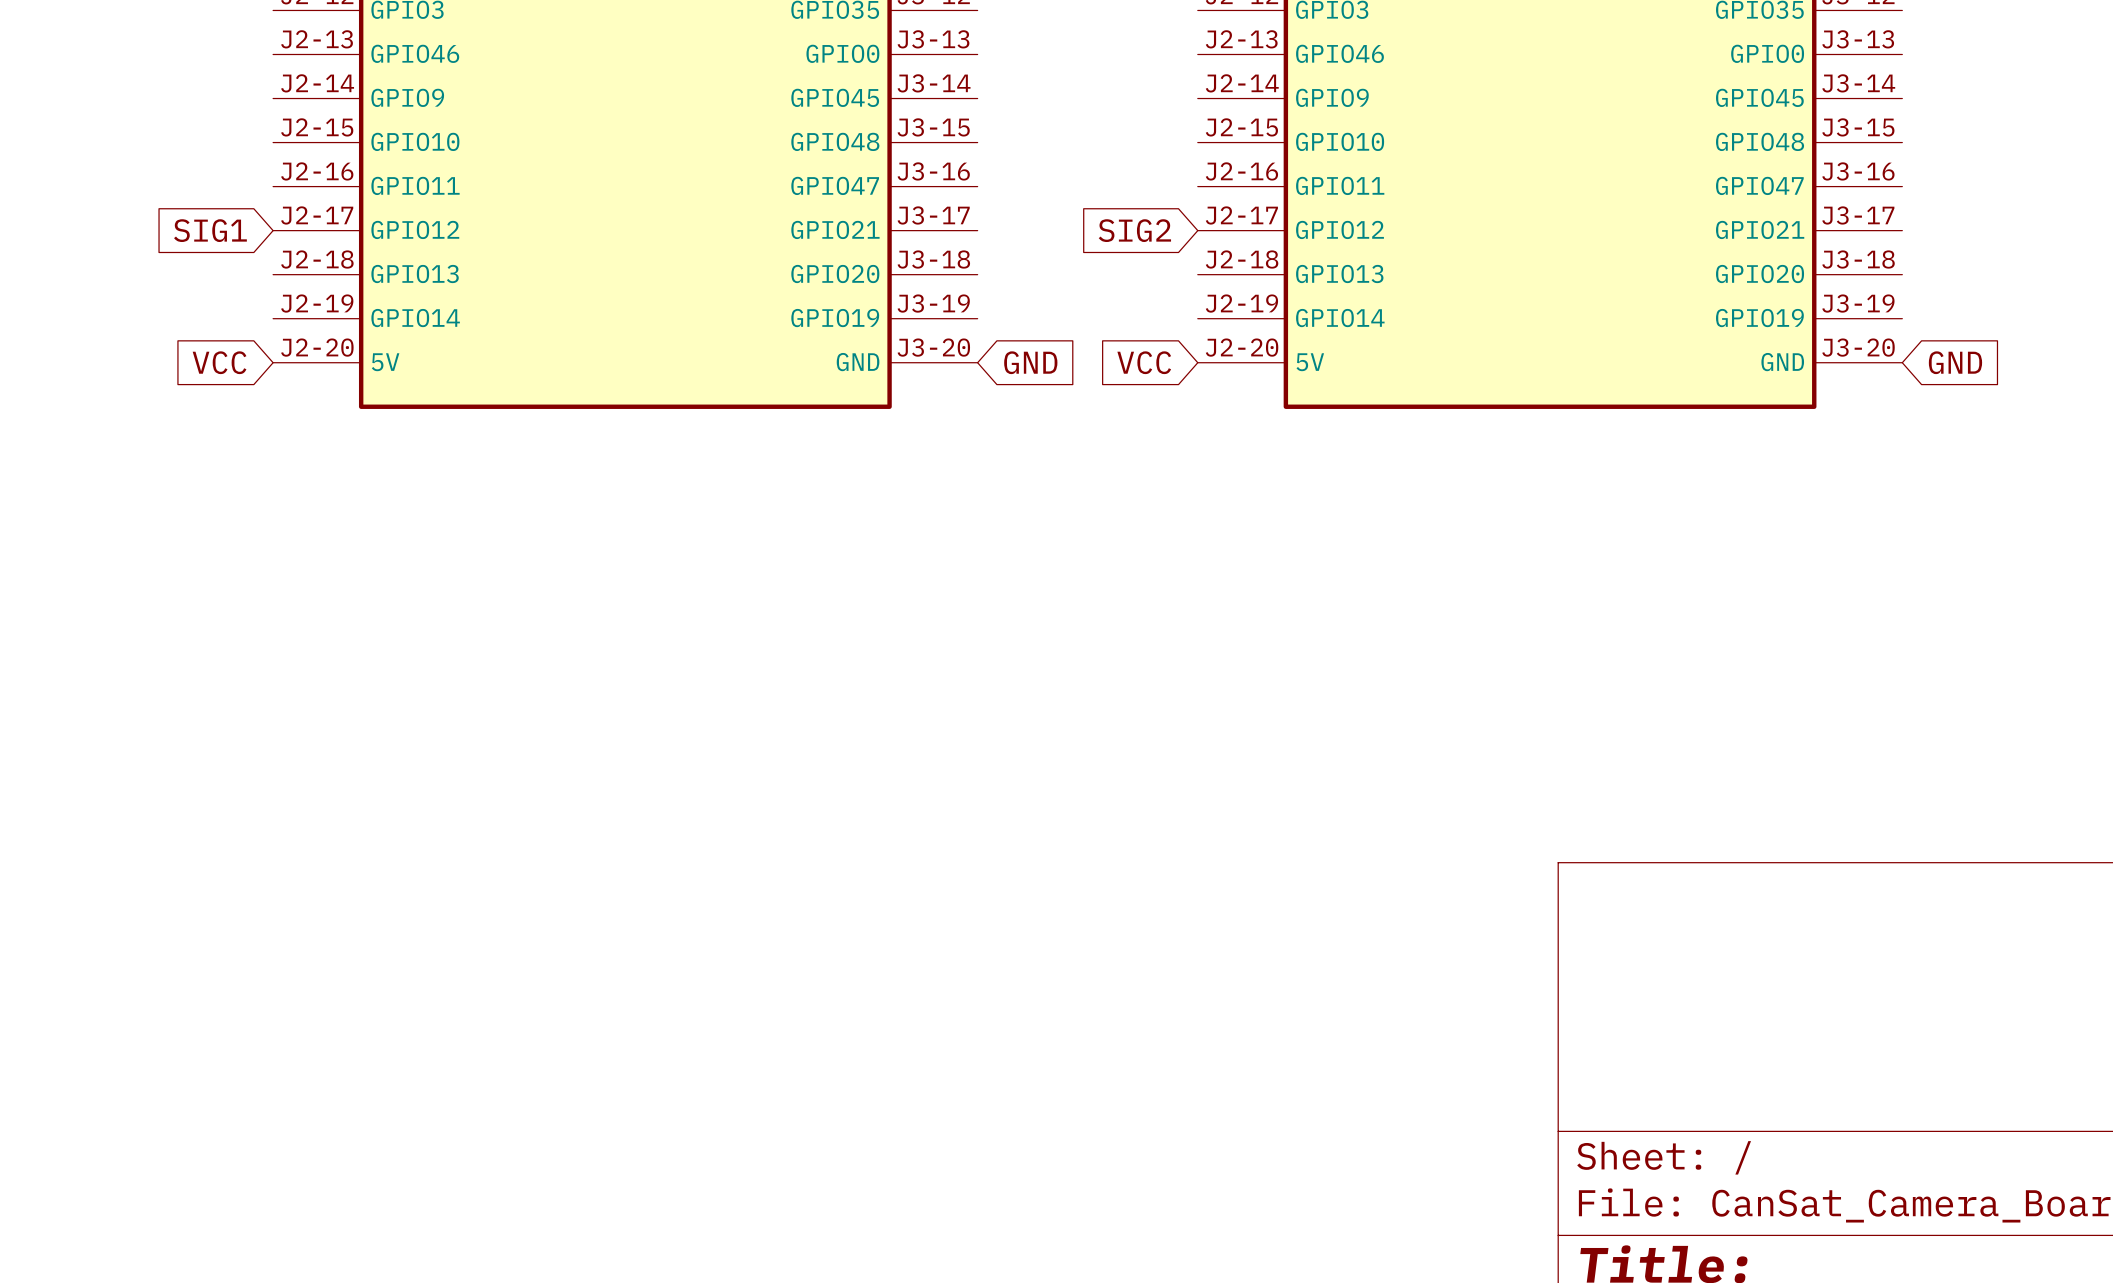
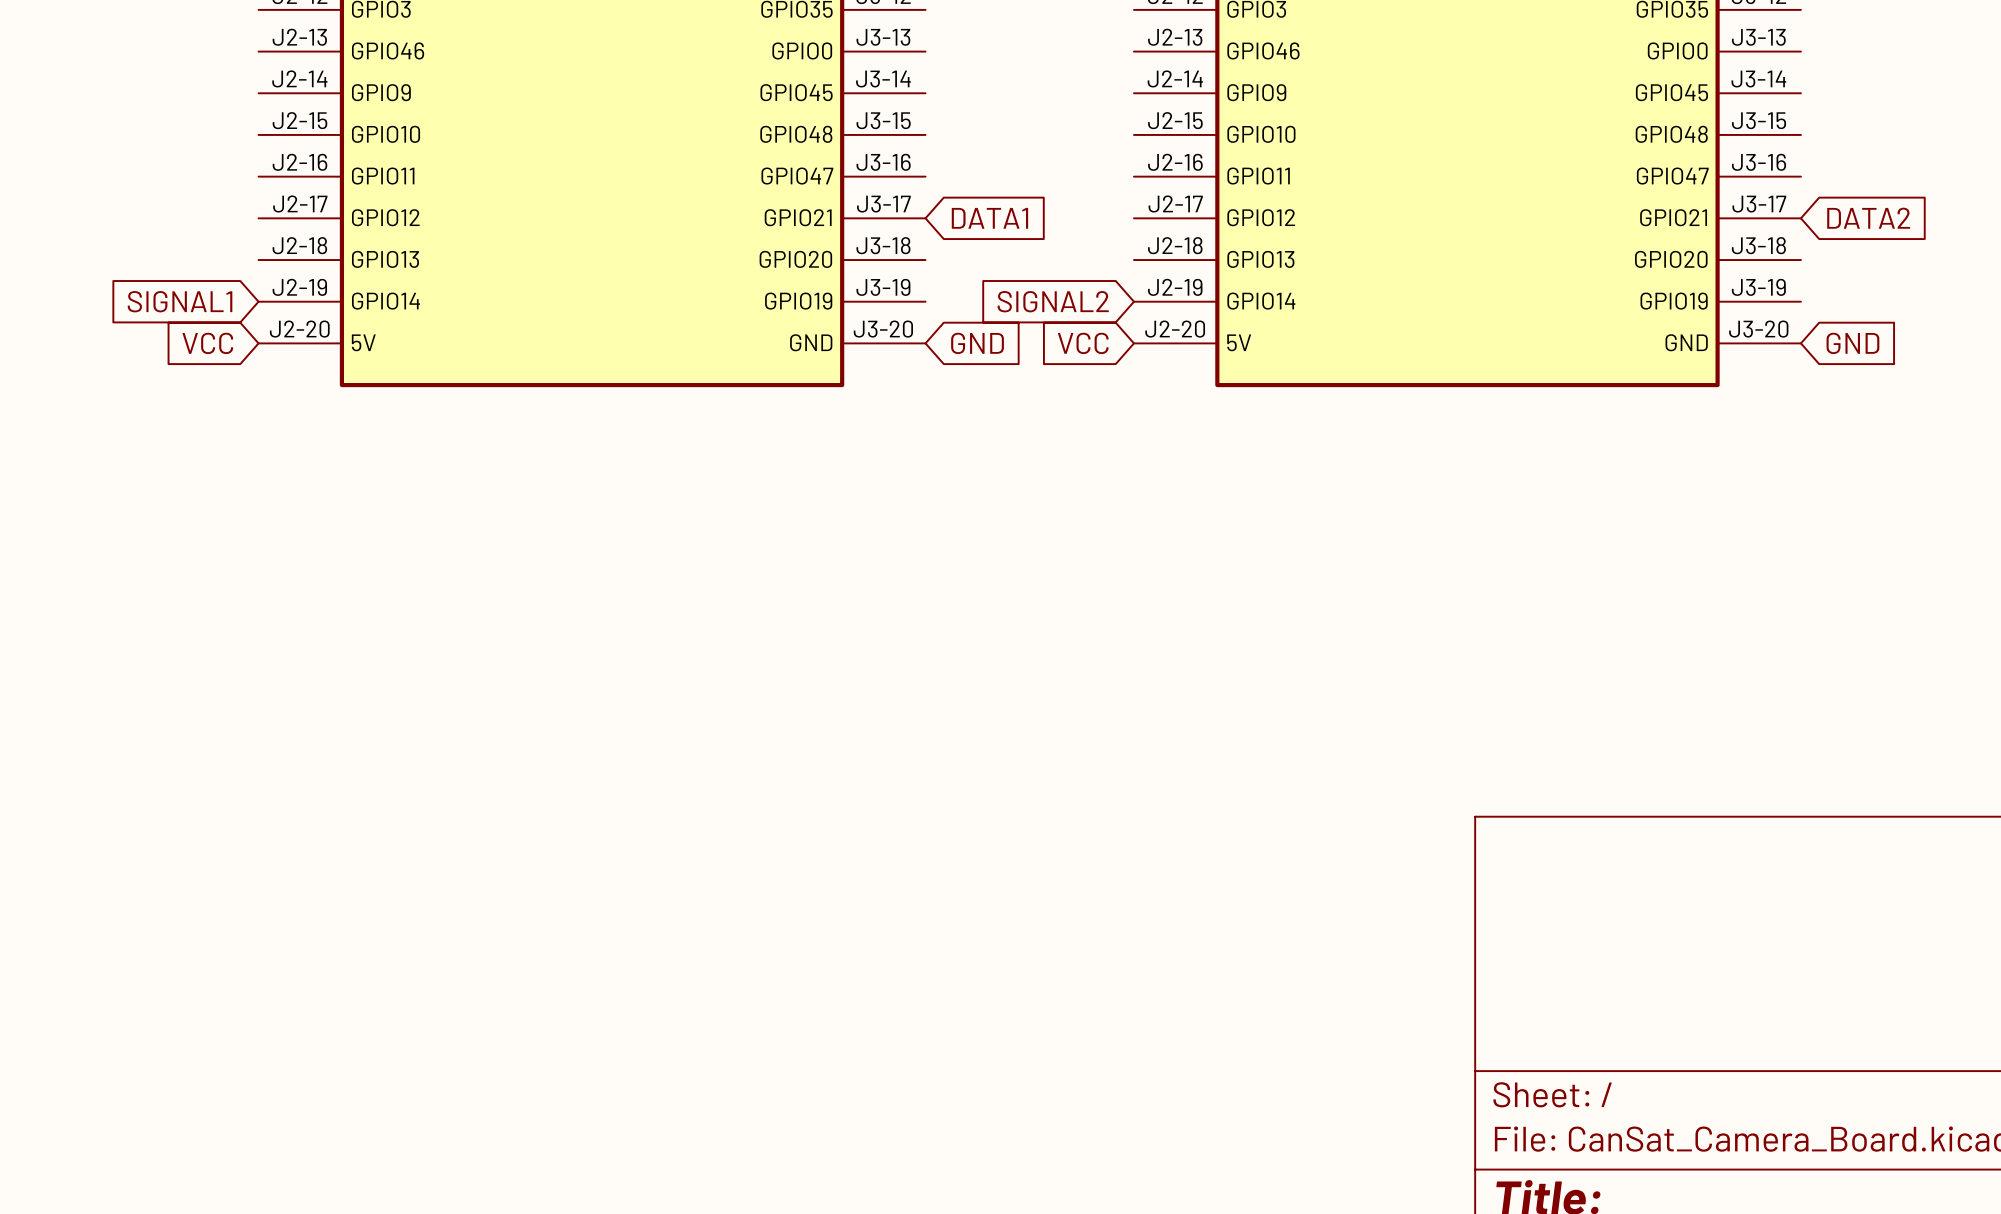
global label: SIG1 (210, 230) -> none
global label: none -> DATA1 (989, 218)
global label: SIG2 (1134, 230) -> none
global label: none -> DATA2 (1868, 218)
global label: none -> SIGNAL1 (180, 301)
global label: none -> SIGNAL2 (1053, 301)

